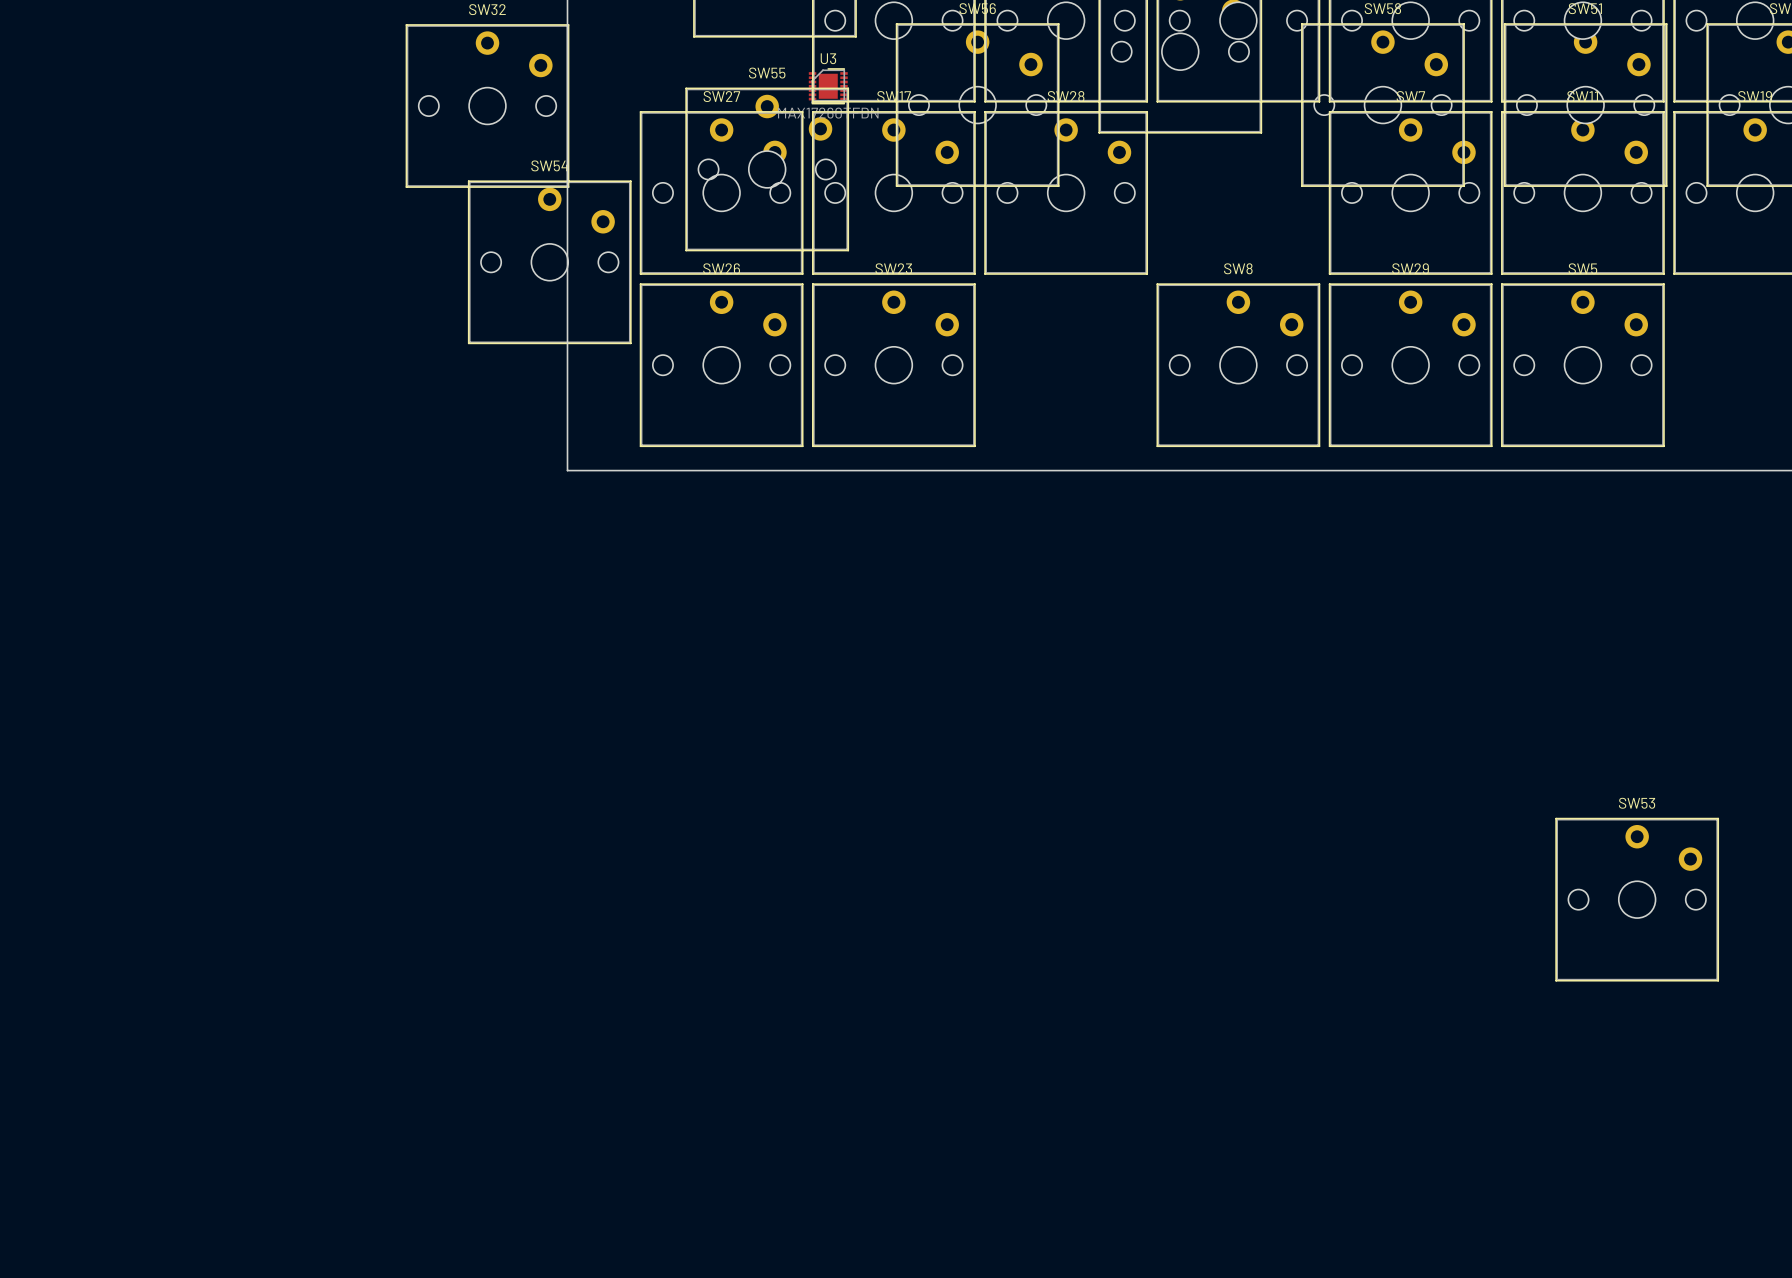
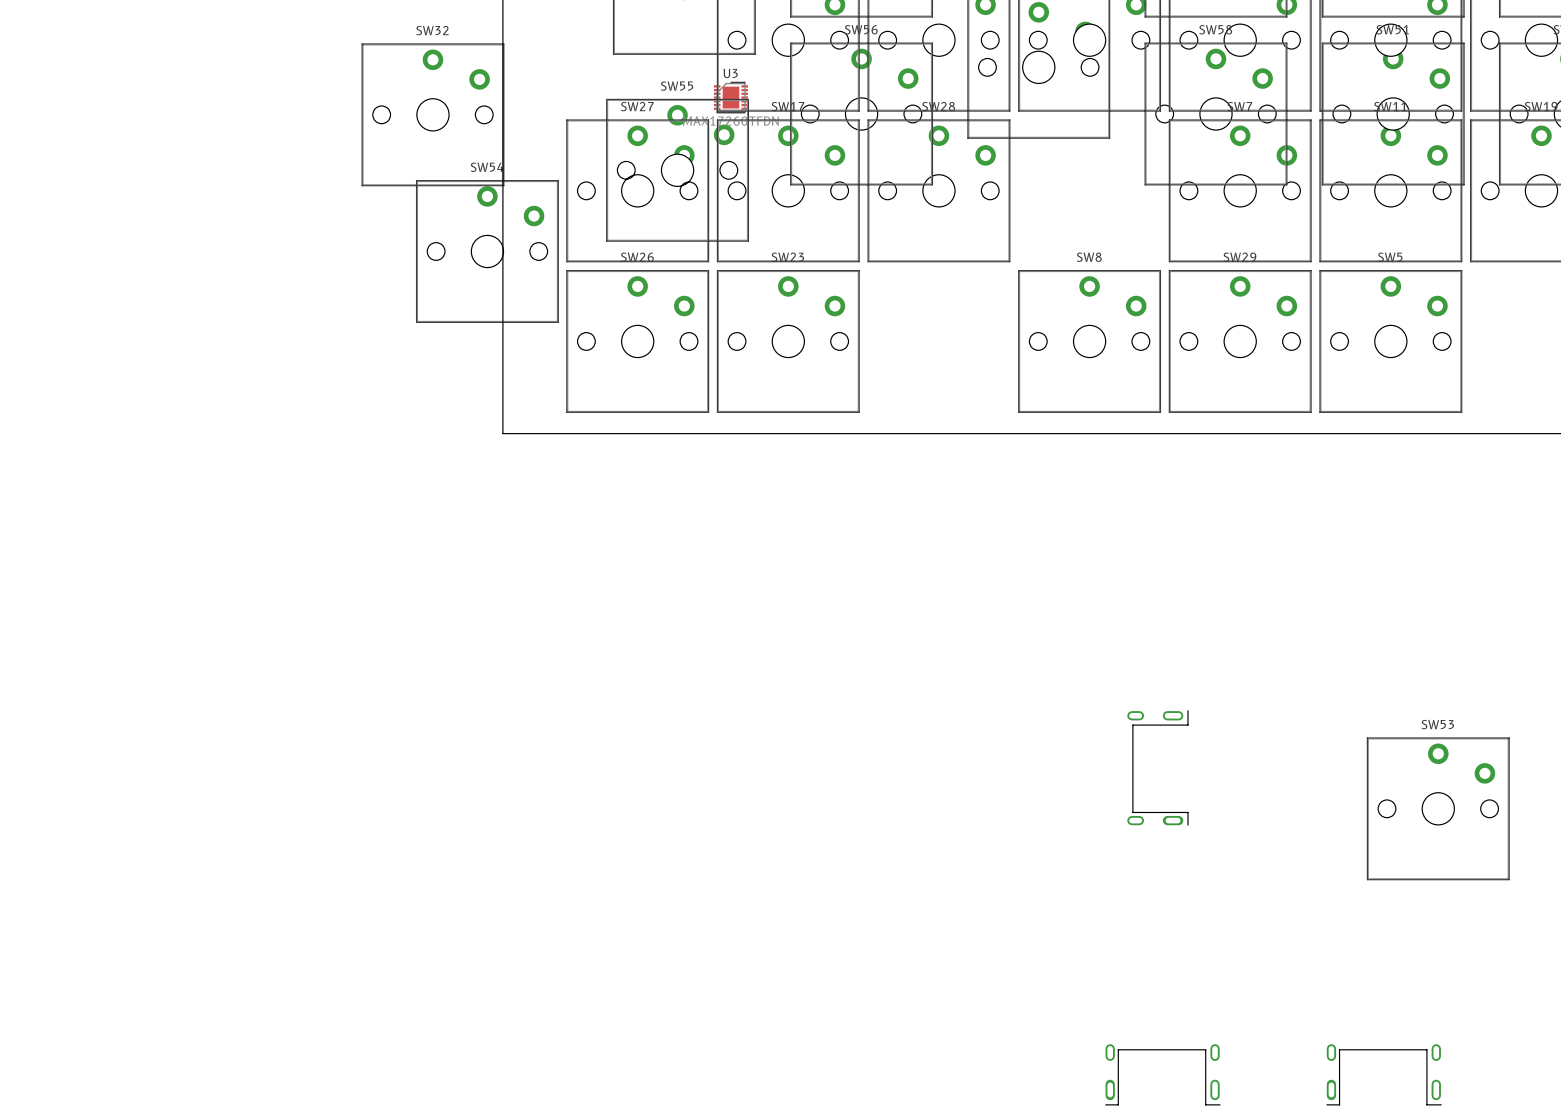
part: none -> (1157, 767)
part: none -> (1162, 1074)
part: none -> (1384, 1074)

